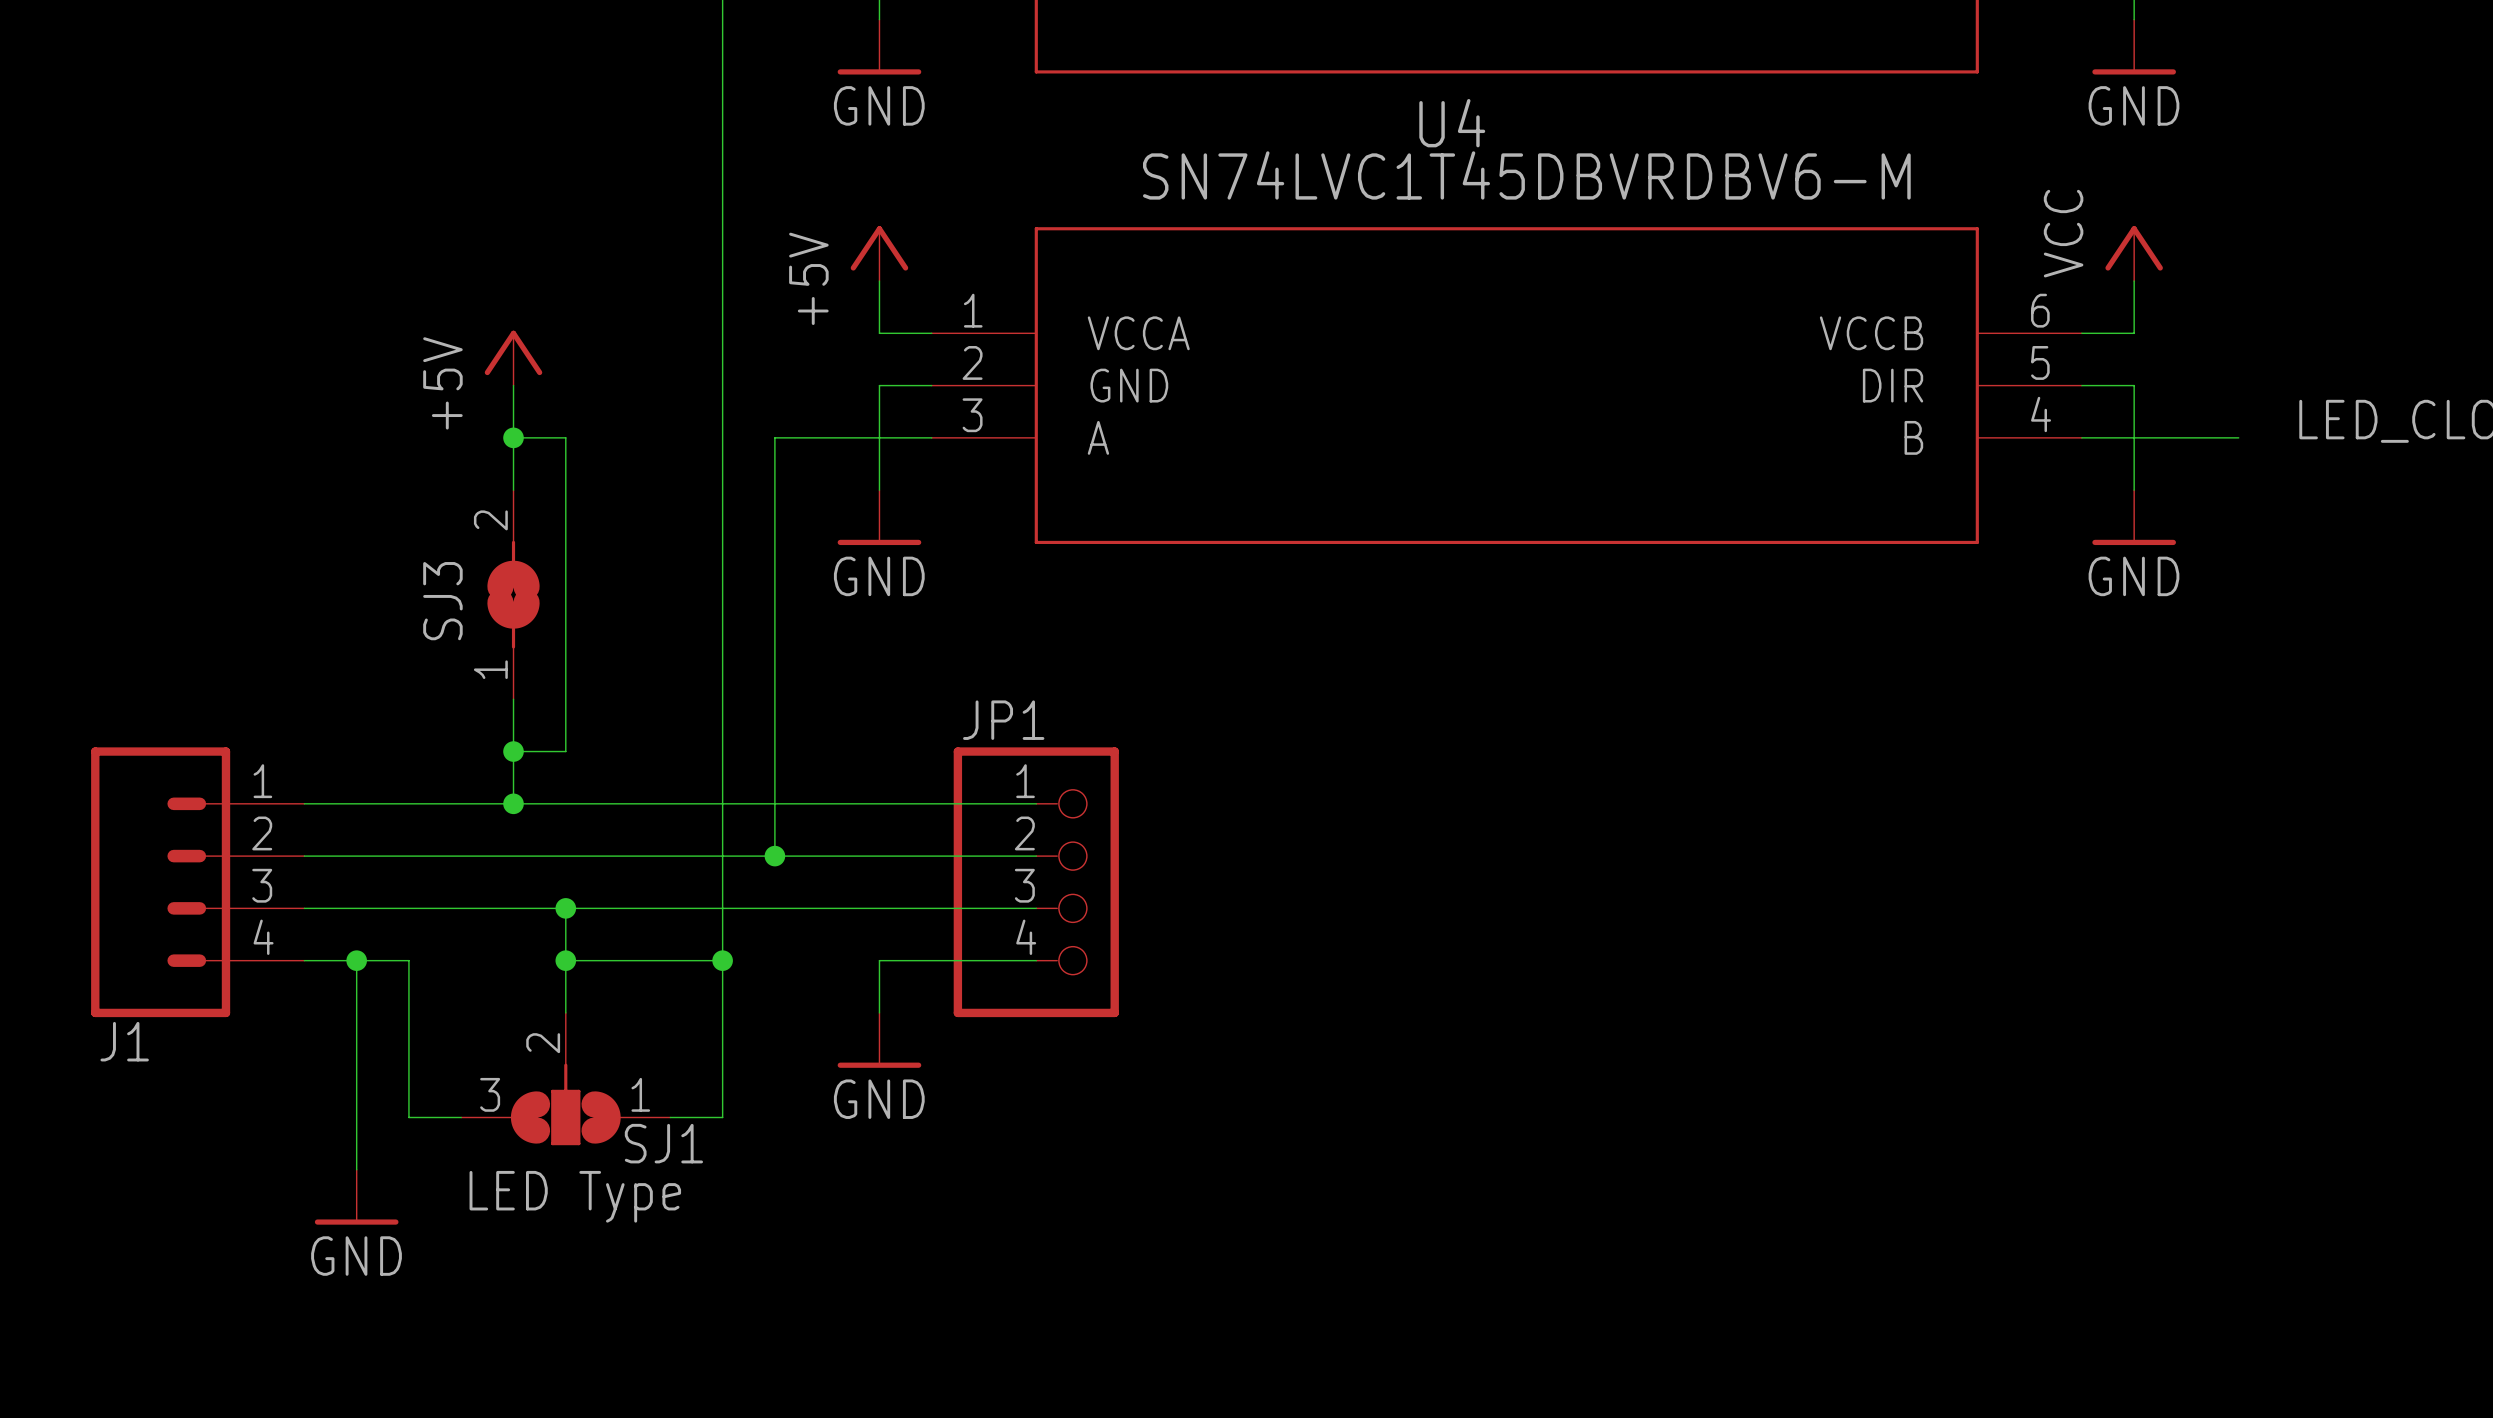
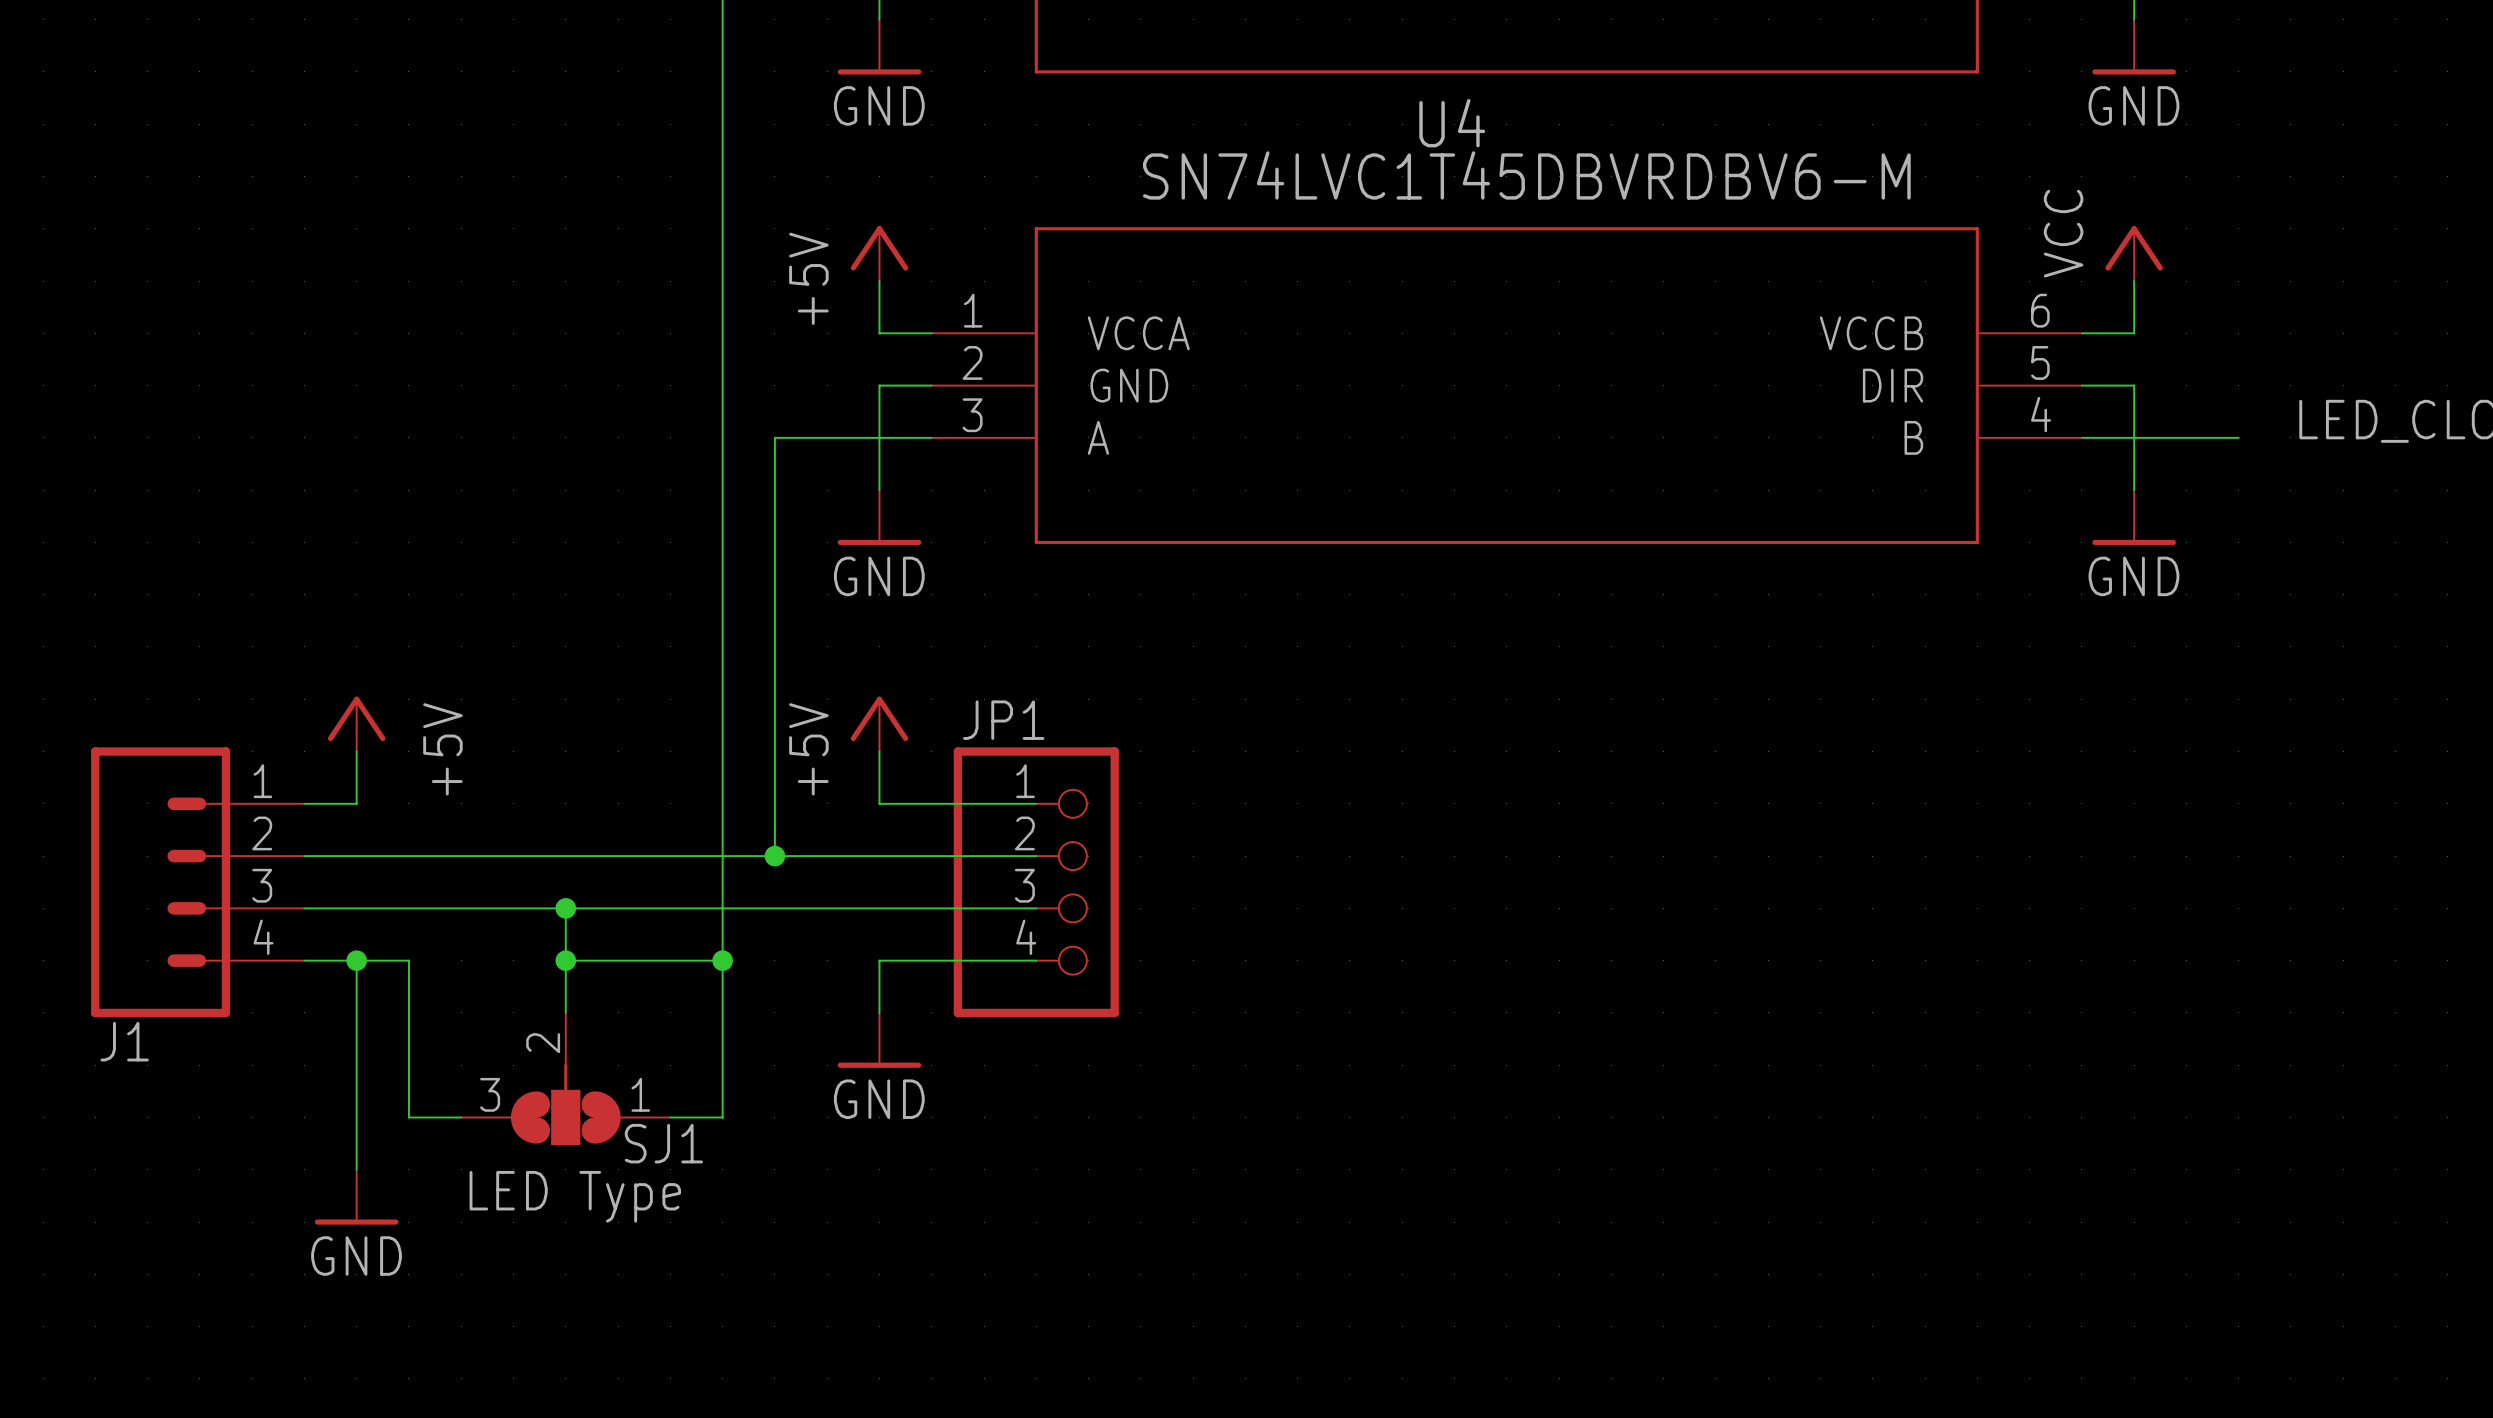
power symbol: +5V (513, 358) -> none
wire: (513, 385) (513, 490) -> none
wire: (513, 437) (565, 437) (565, 751) (513, 751) -> none
junction: (513, 437) -> none
SJ3: (513, 594) -> none
wire: (513, 699) (513, 803) -> none
power symbol: none -> +5V (356, 724)
power symbol: none -> +5V (879, 724)
junction: (513, 751) -> none
wire: none -> (879, 751) (879, 803)
wire: (356, 803) (879, 803) -> (356, 803) (356, 751)
junction: (513, 803) -> none

